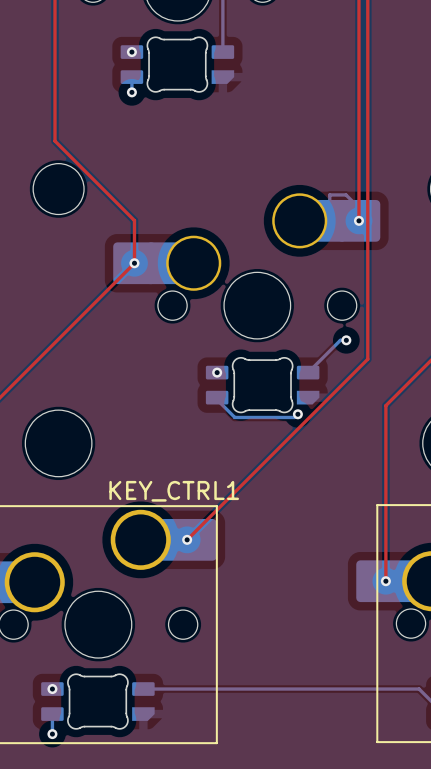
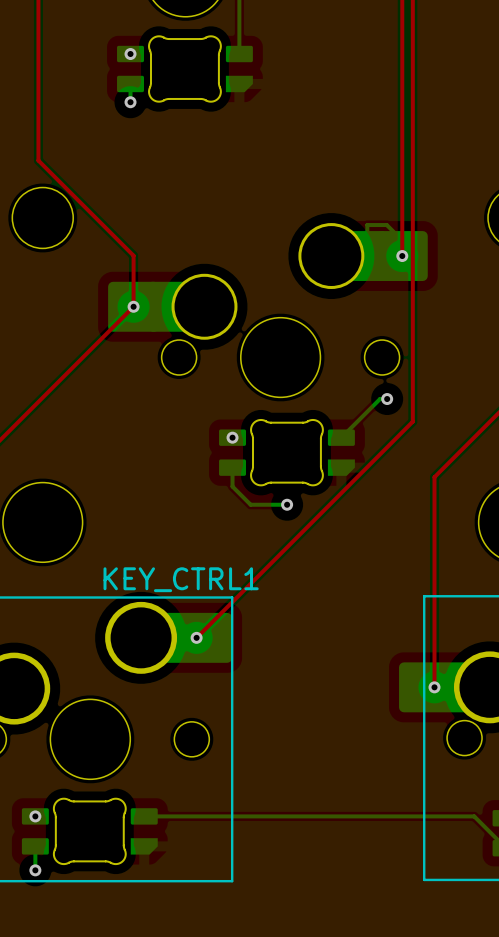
bottom track: (217, 399) (234, 417) (294, 417) (297, 414) -> (232, 470) (232, 486) (250, 504) (287, 504)
via position: (297, 414) -> (287, 504)

